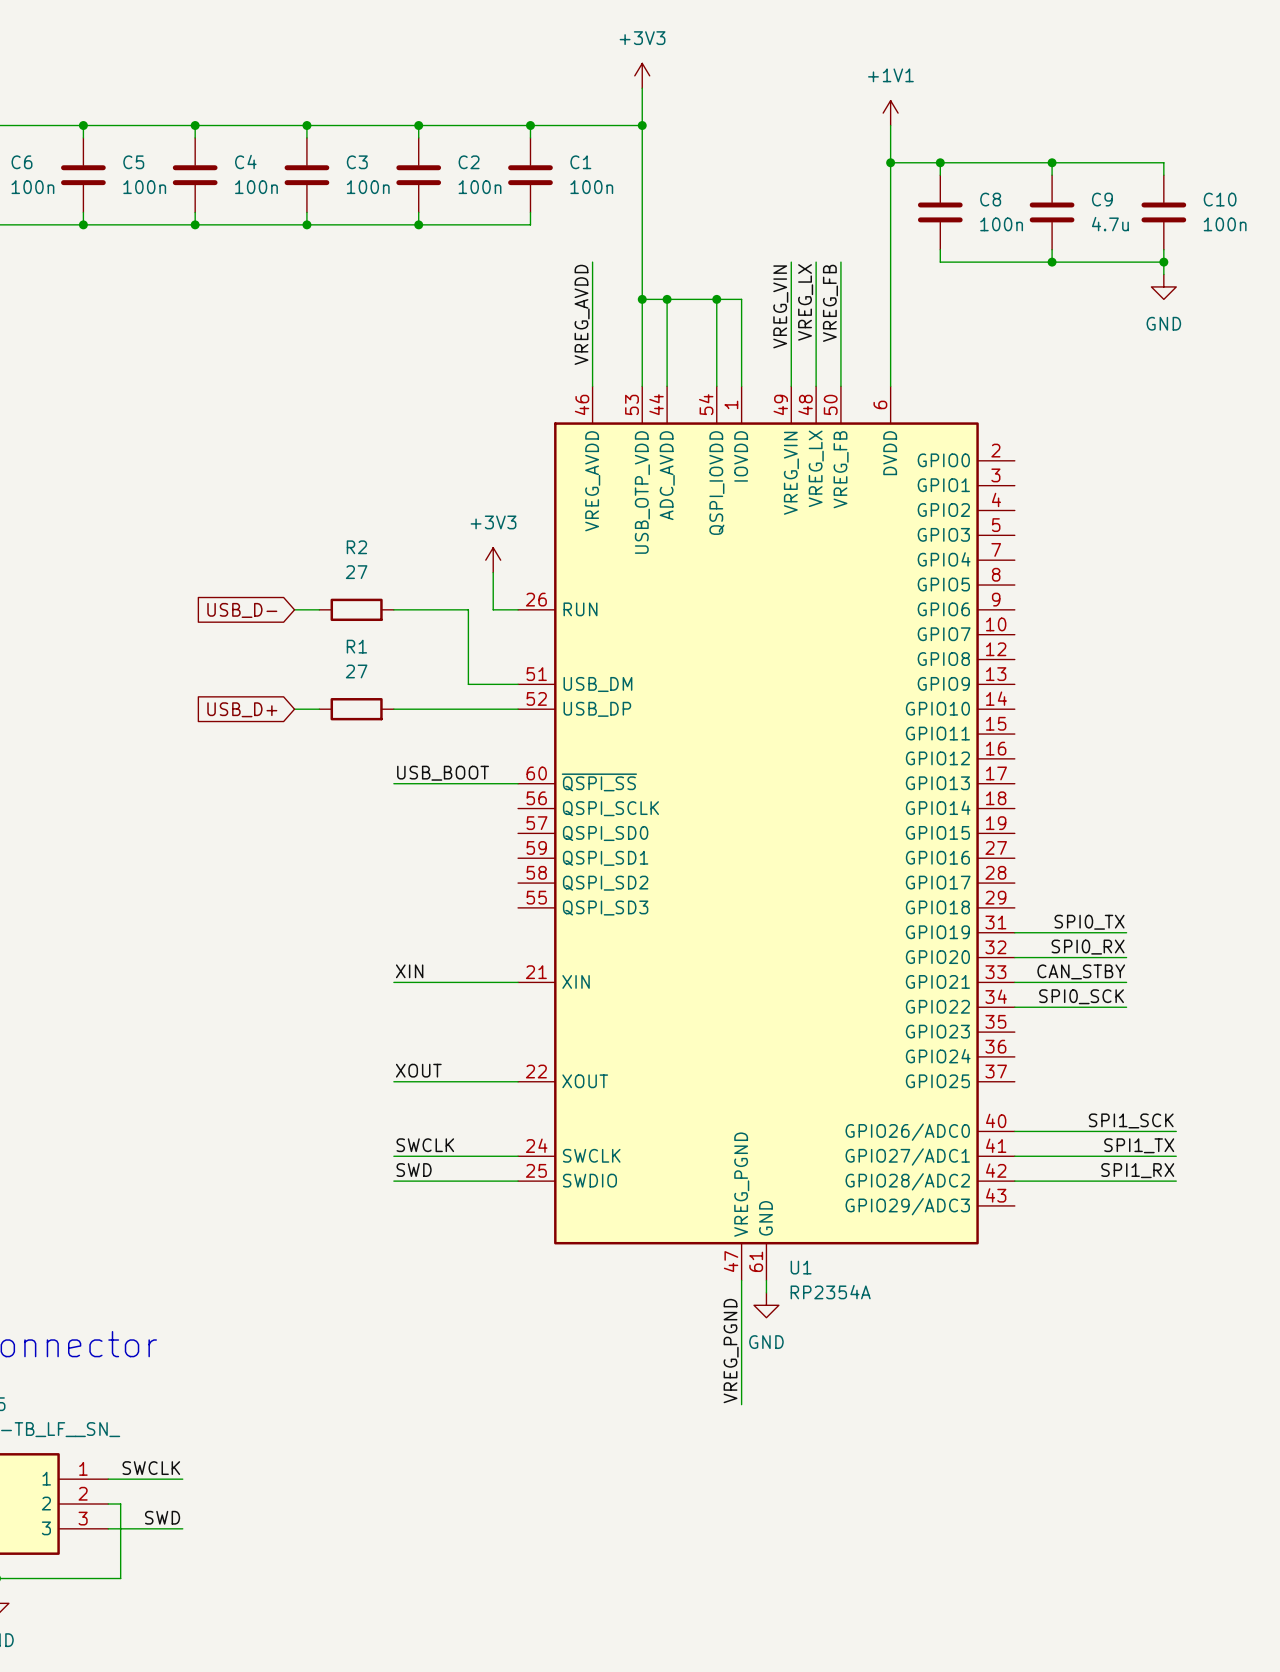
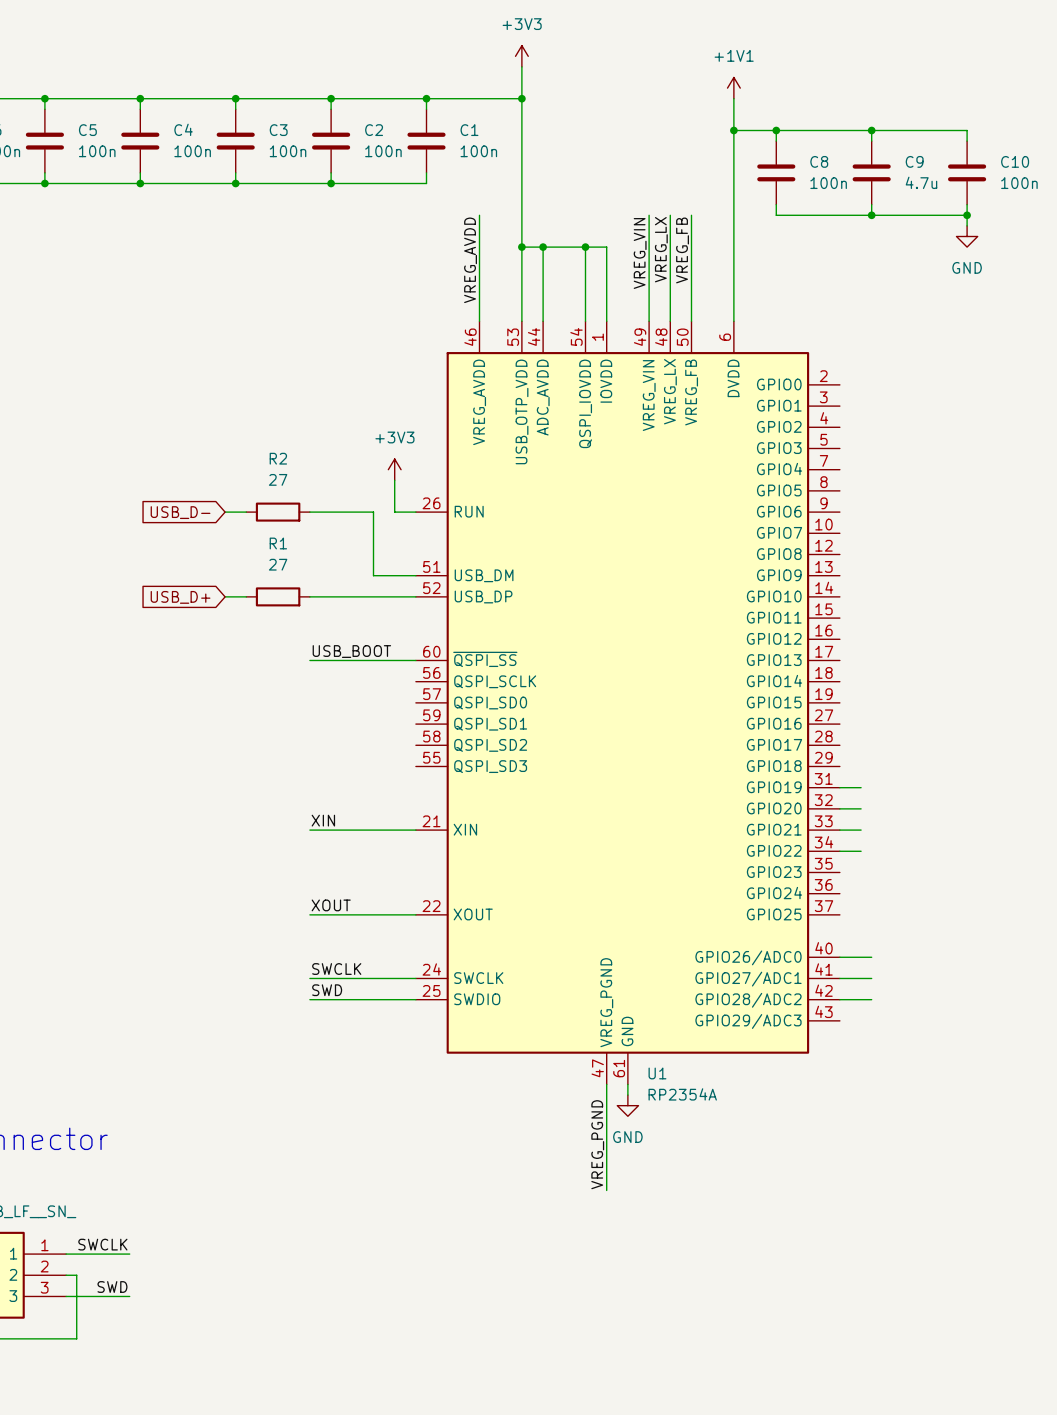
label: SPI0_TX (1089, 922) -> none
wire: (1039, 932) (1126, 932) -> none
label: SPI0_RX (1088, 947) -> none
wire: (1039, 957) (1126, 957) -> none
label: CAN_STBY (1081, 971) -> none
wire: (1039, 982) (1126, 982) -> none
label: SPI0_SCK (1081, 996) -> none
wire: (1039, 1007) (1126, 1007) -> none
label: SPI1_SCK (1131, 1120) -> none
wire: (1052, 1131) (1176, 1131) -> none
label: SPI1_TX (1139, 1145) -> none
wire: (1052, 1156) (1176, 1156) -> none
label: SPI1_RX (1137, 1170) -> none
wire: (1052, 1181) (1176, 1181) -> none

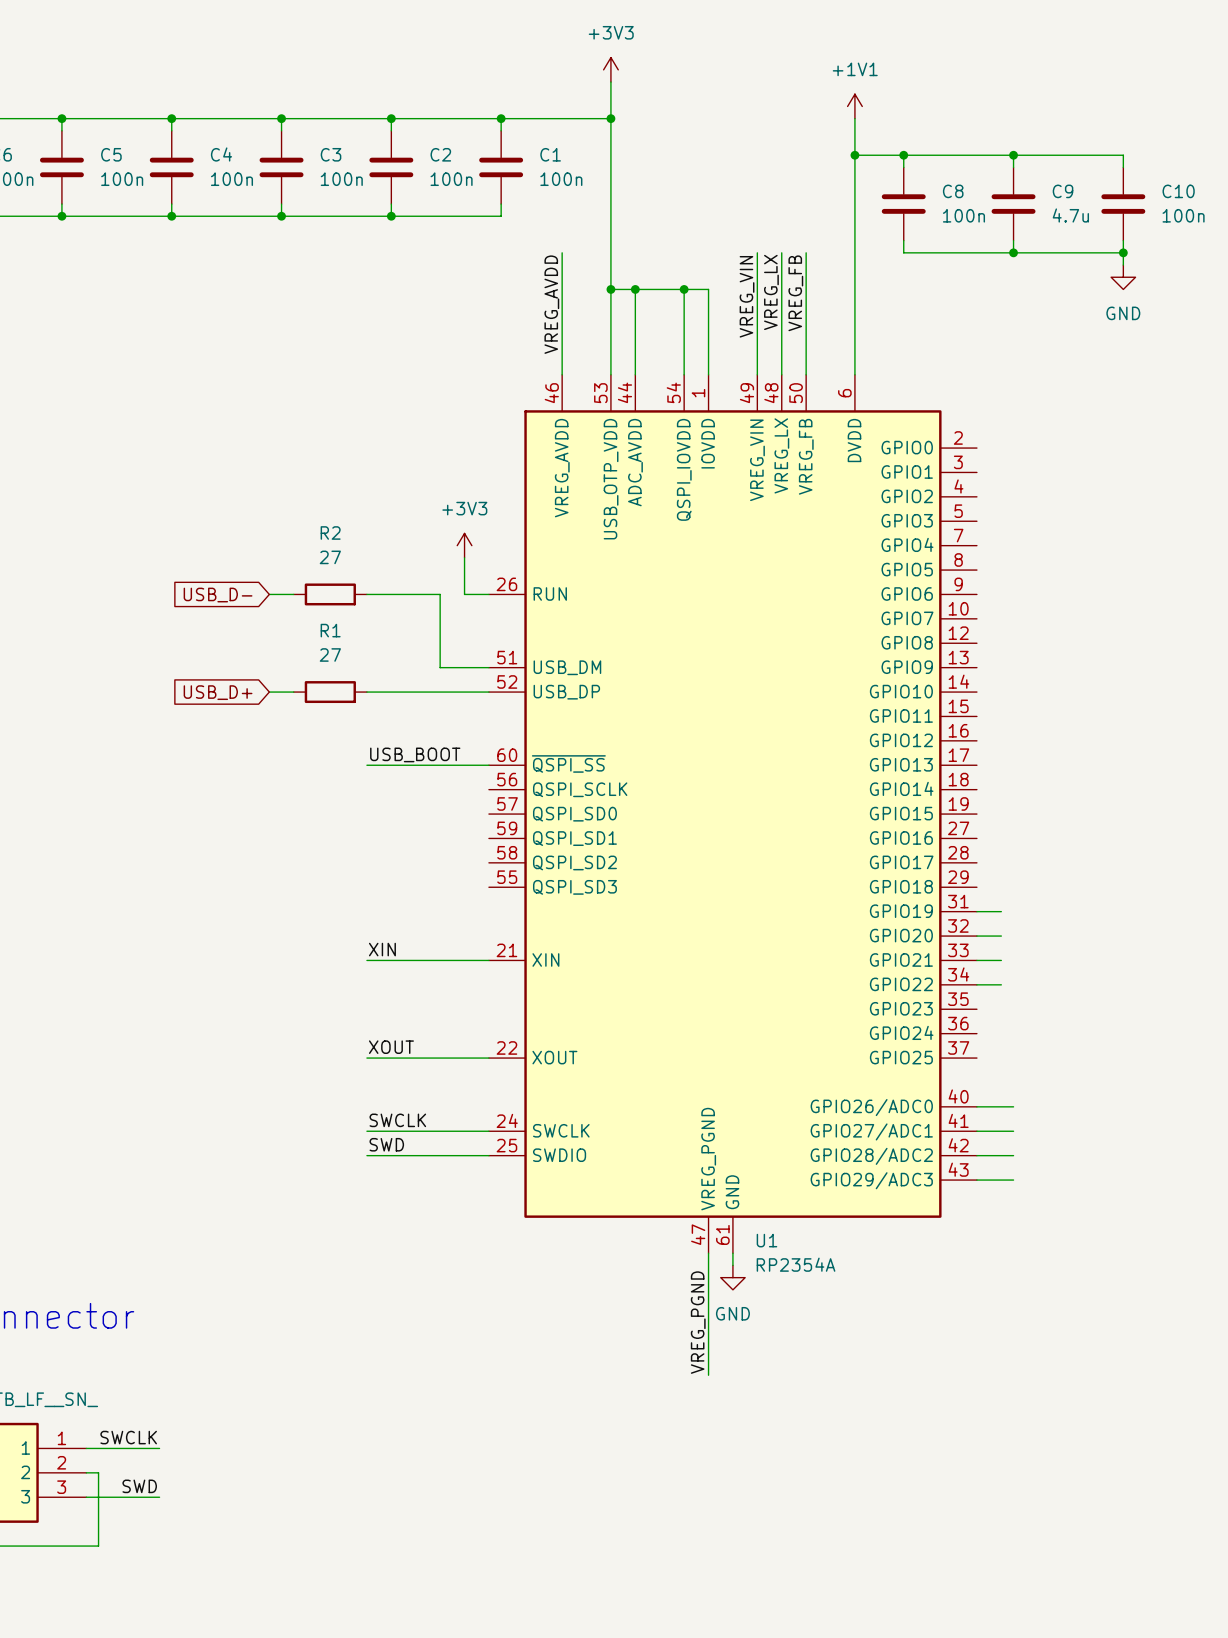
wire: none -> (976, 1180) (1013, 1180)

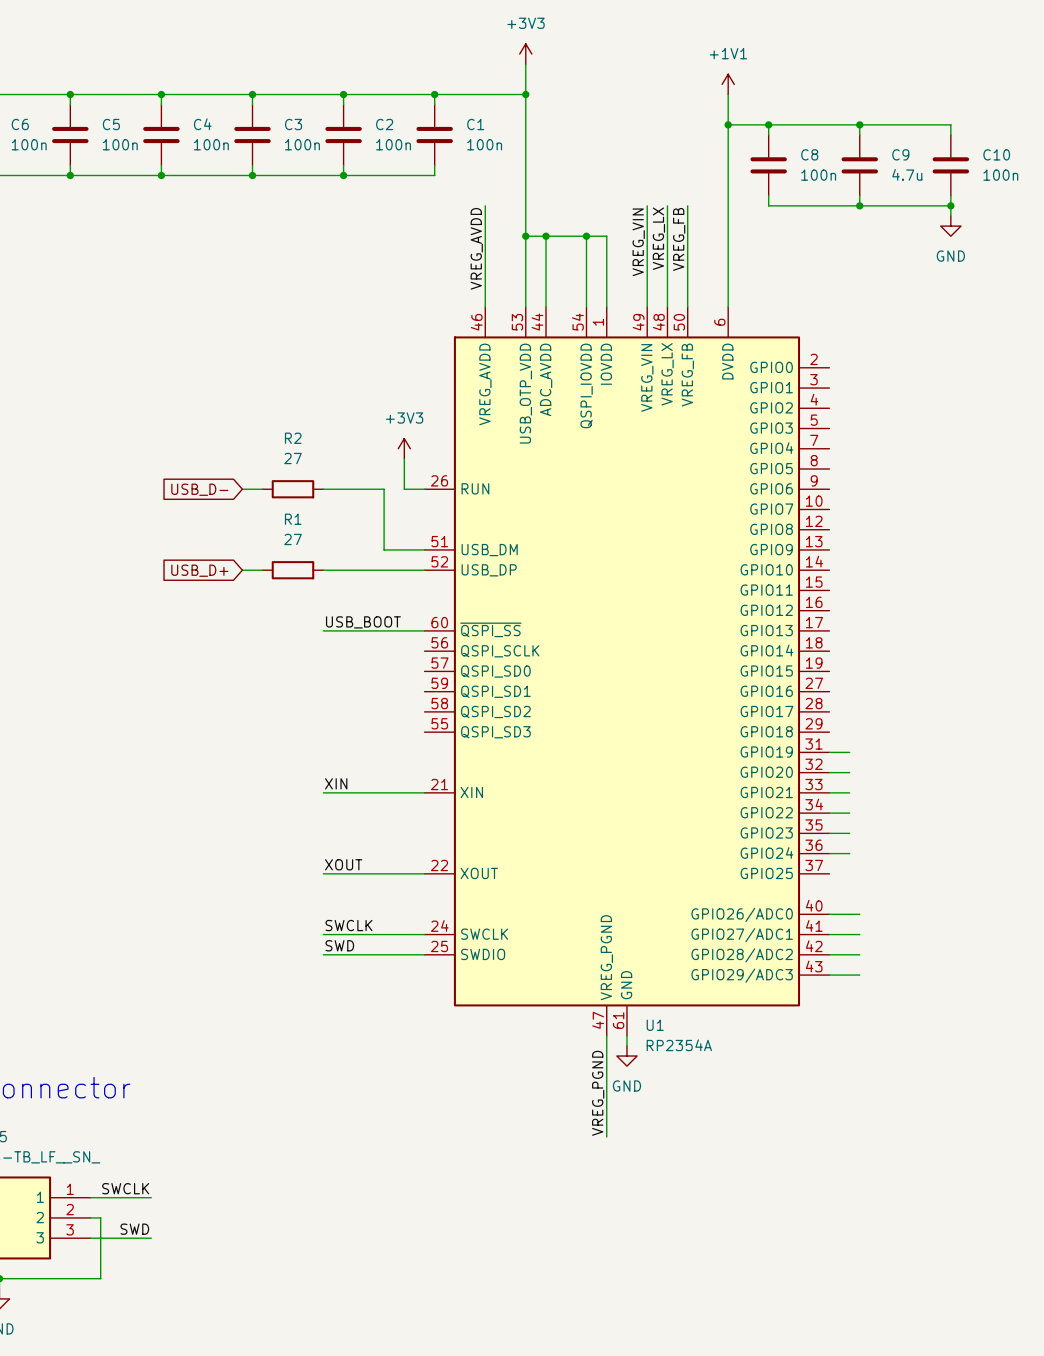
wire: none -> (829, 833) (849, 833)
wire: none -> (829, 853) (849, 853)

